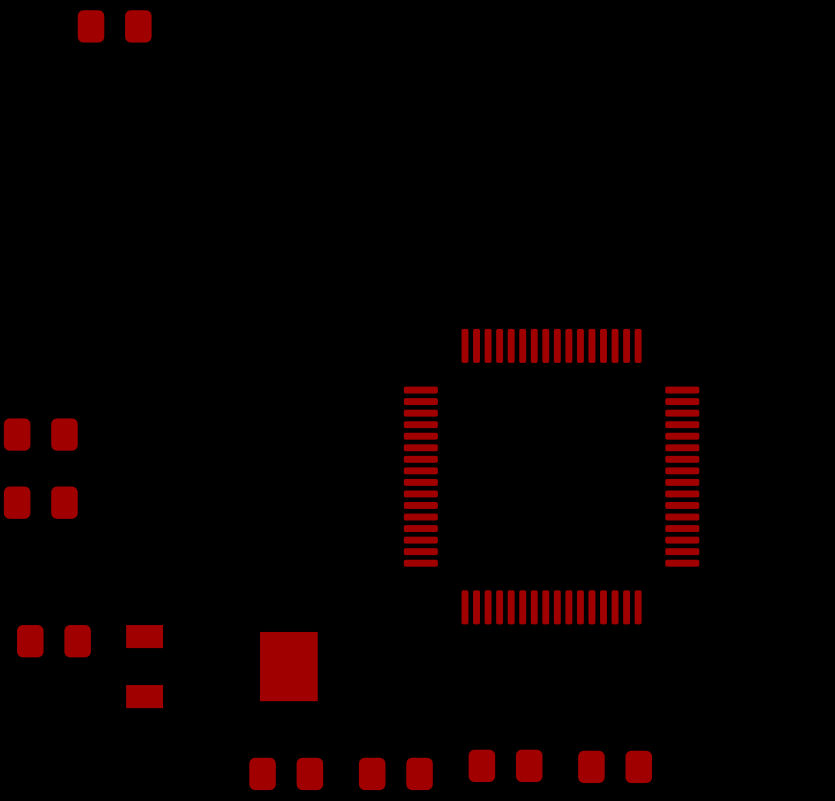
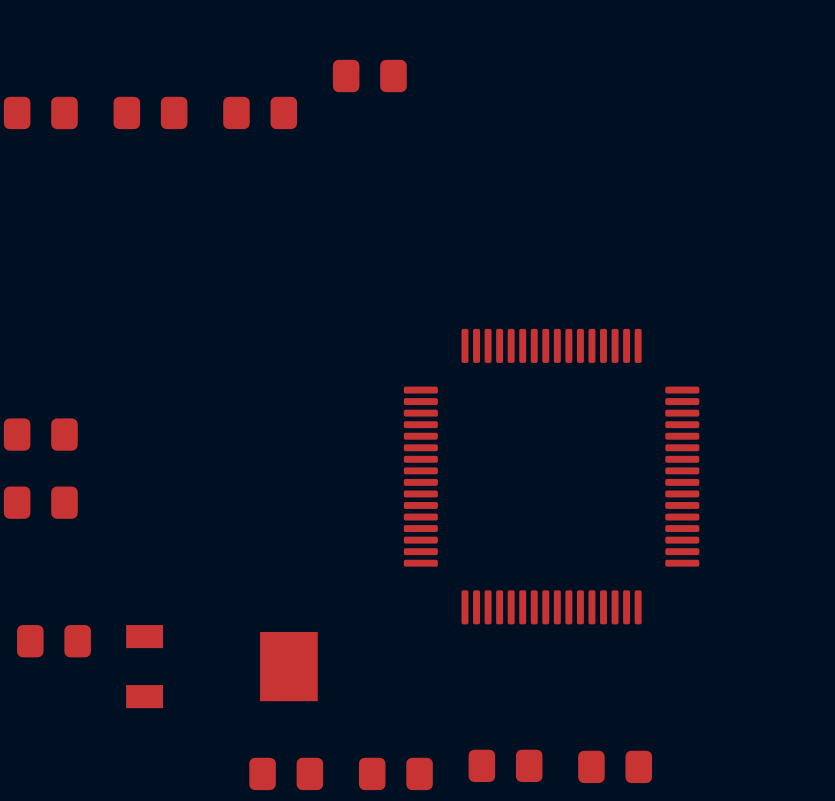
part: (114, 26) -> none
part: none -> (369, 76)
part: none -> (40, 112)
part: none -> (150, 112)
part: none -> (260, 112)

